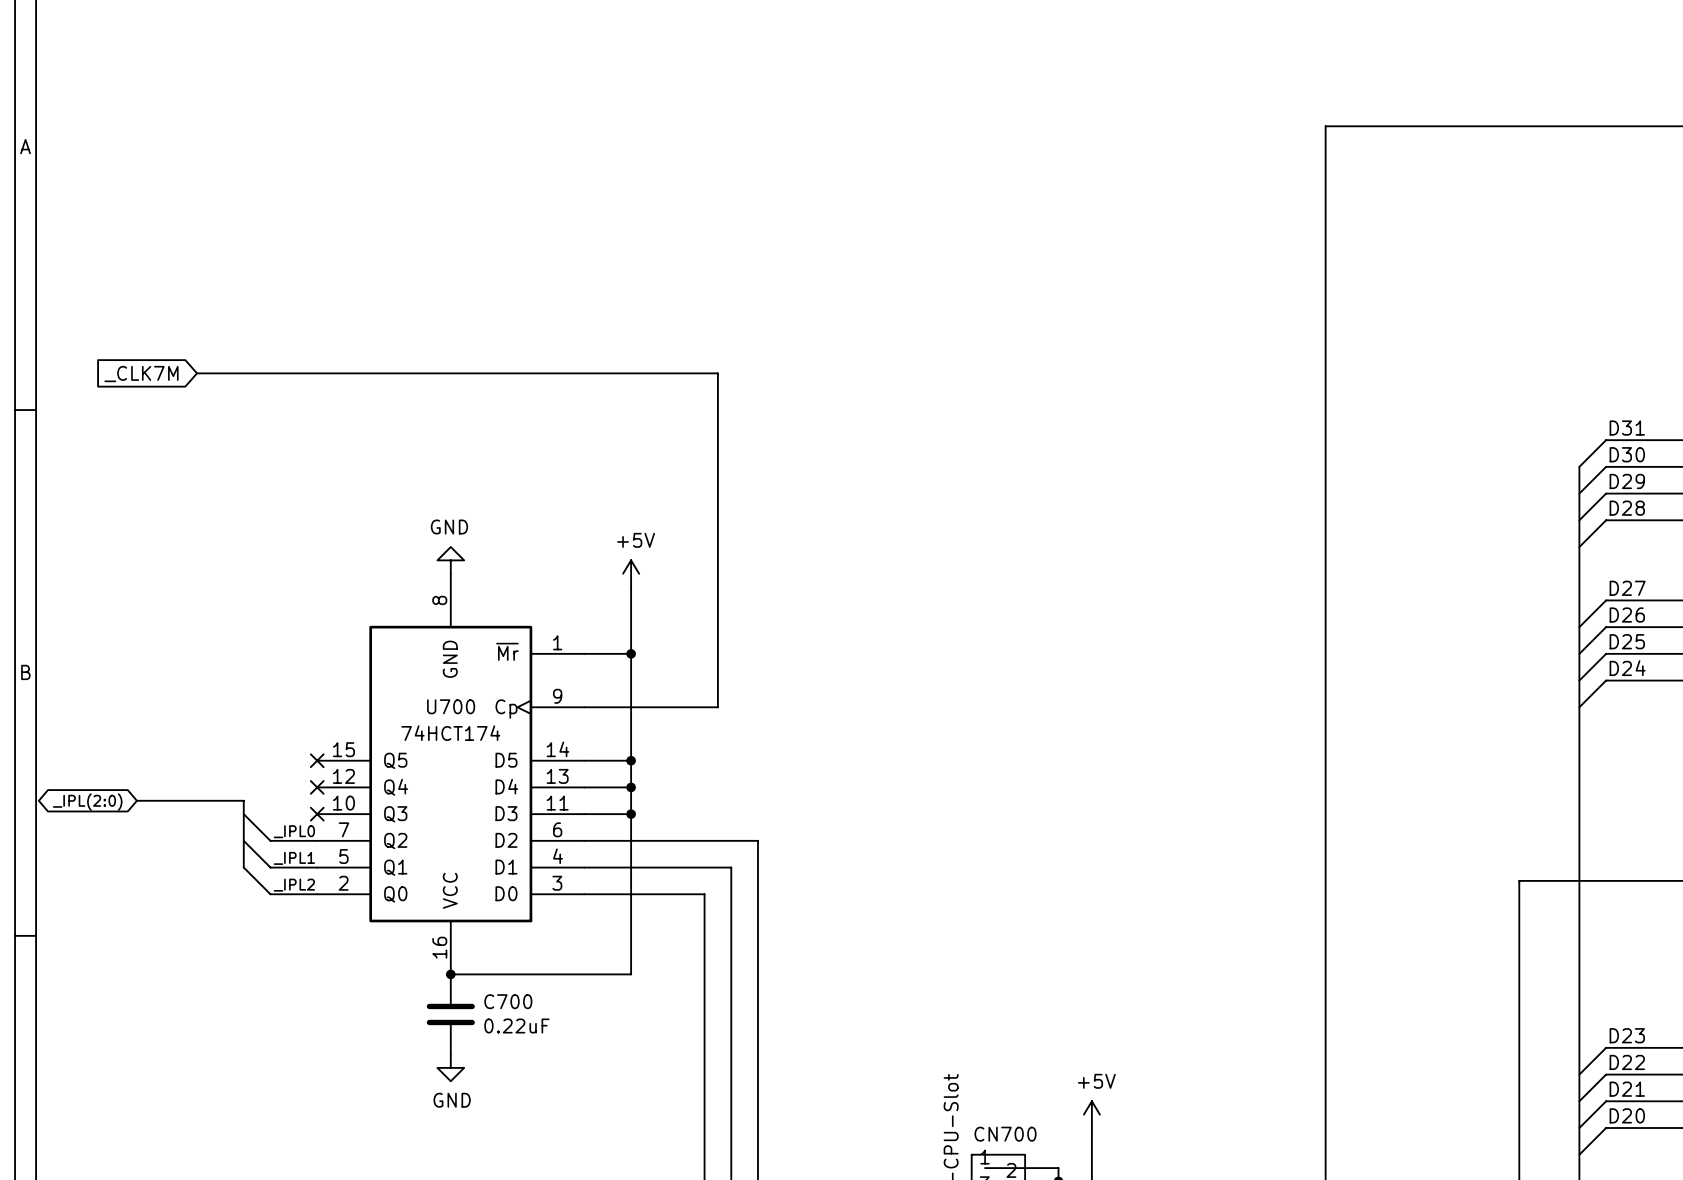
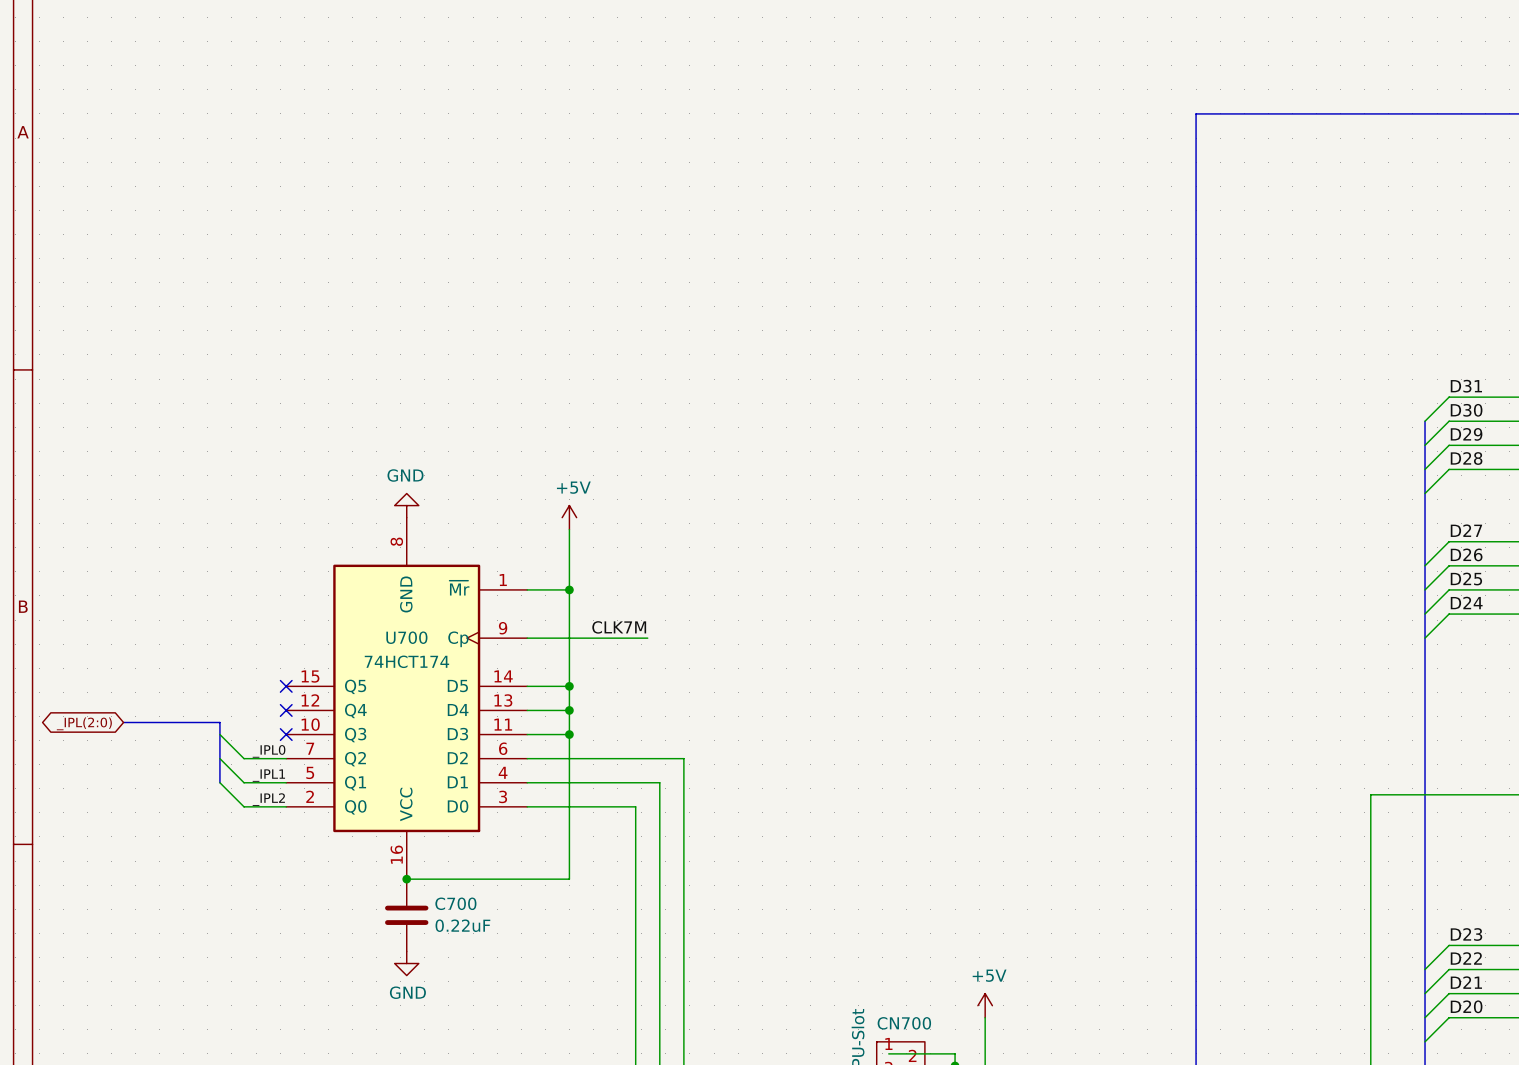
wire: (197, 373) (717, 373) (717, 707) -> none
global label: _CLK7M (141, 374) -> none
label: none -> CLK7M (619, 627)

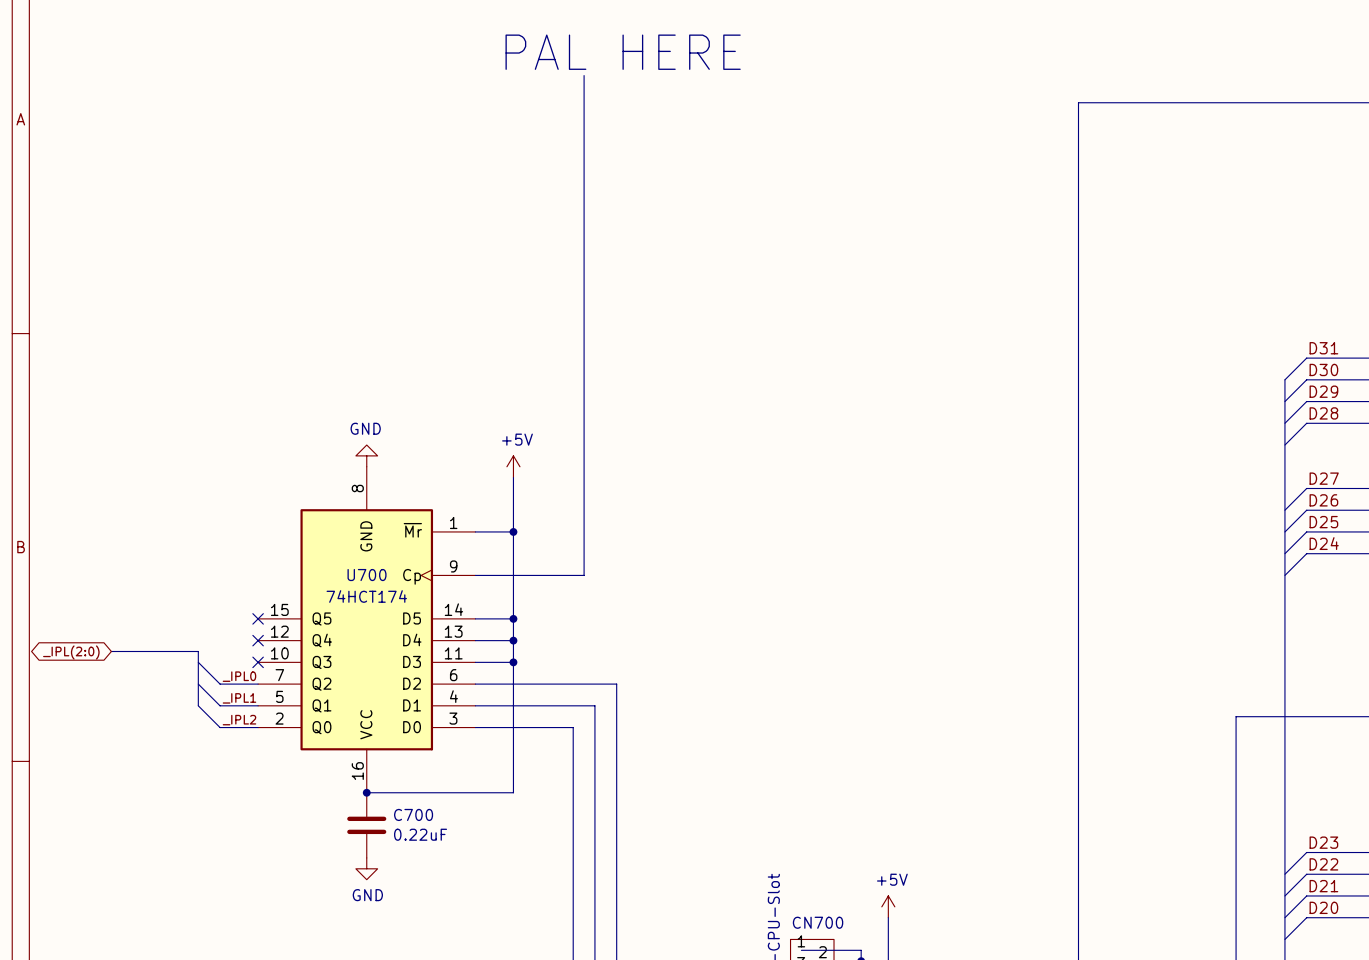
text: none -> PAL HERE (623, 52)
wire: none -> (584, 75) (584, 575)
label: CLK7M (619, 627) -> none

